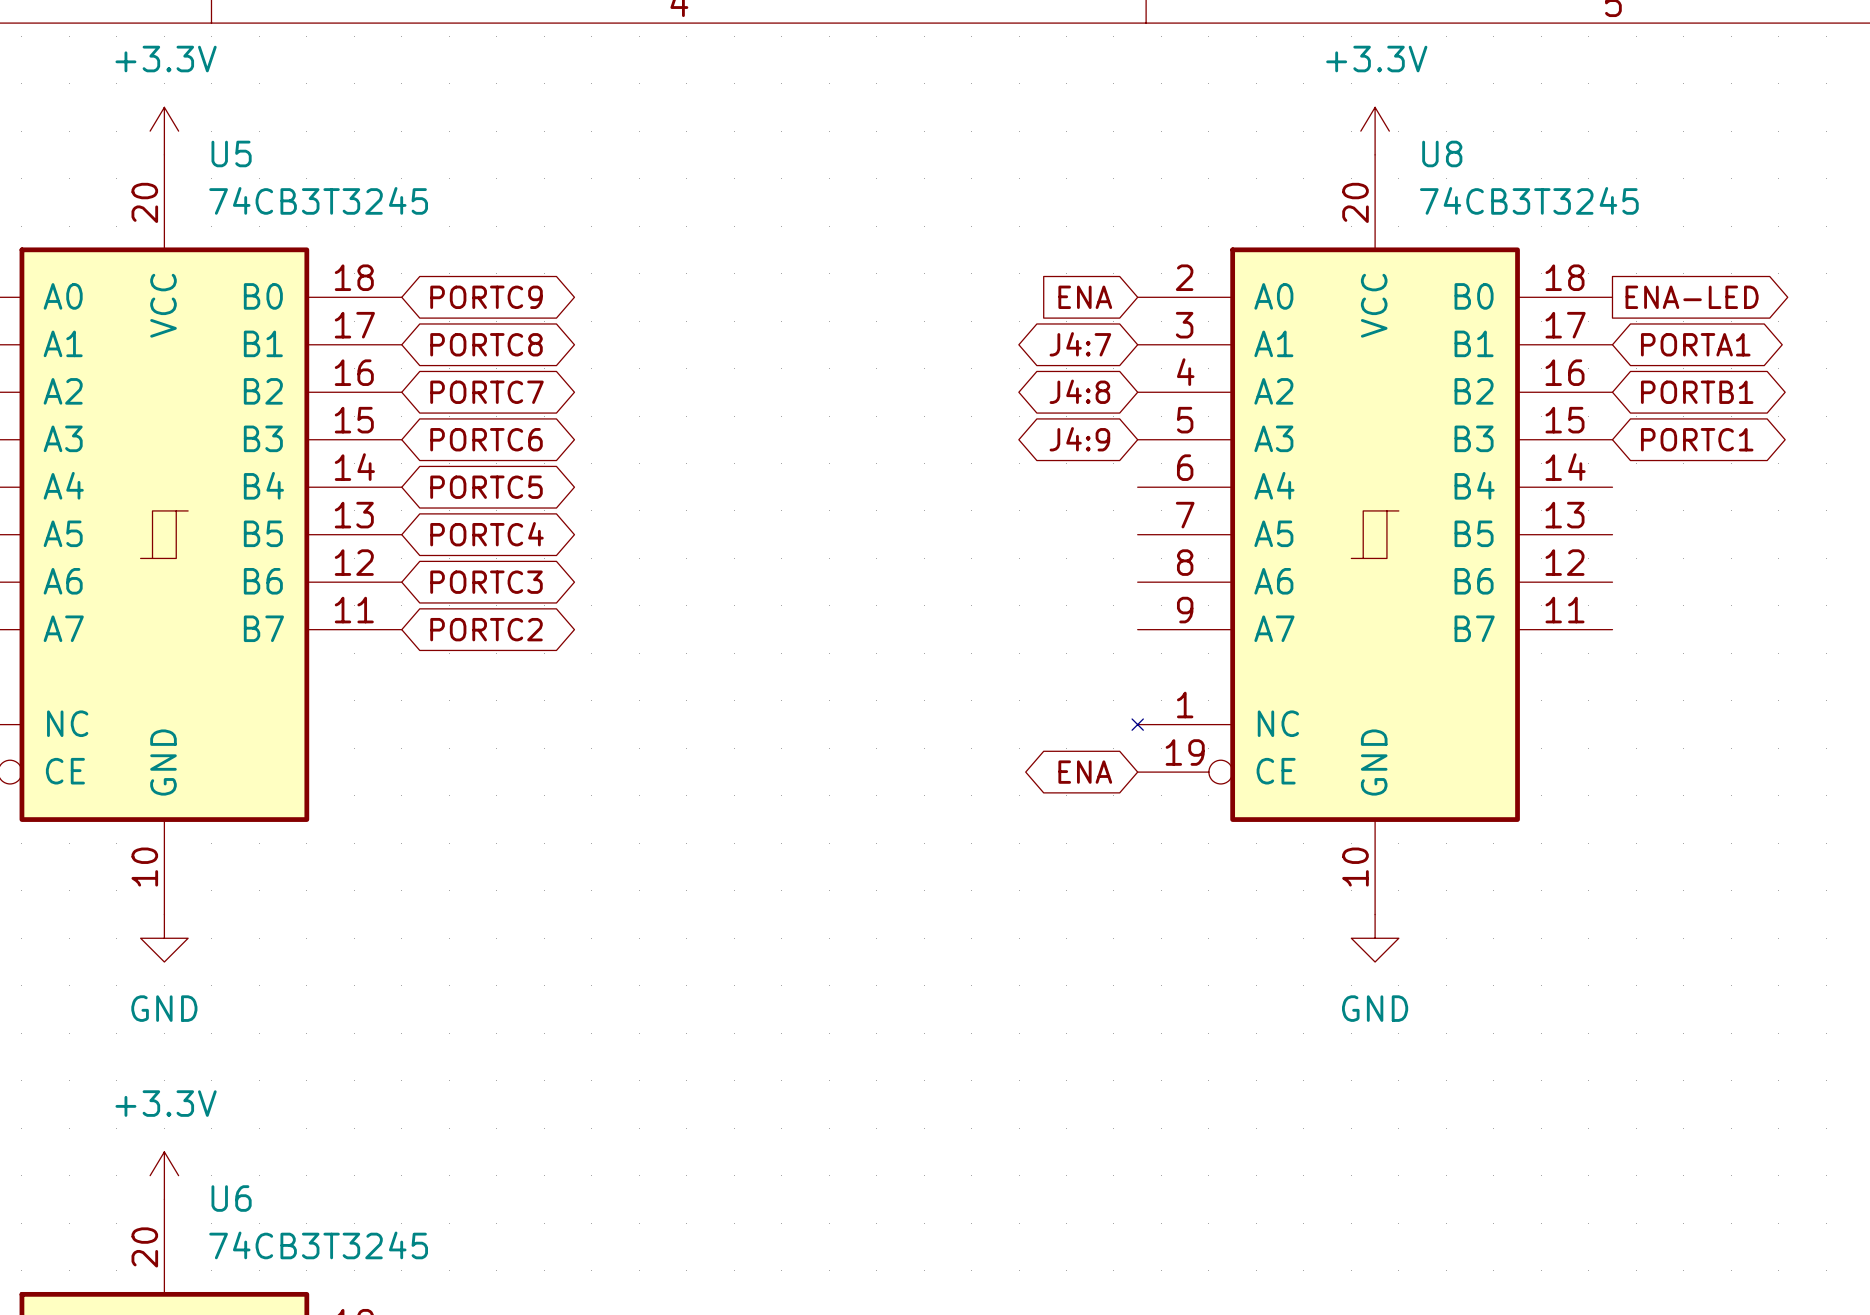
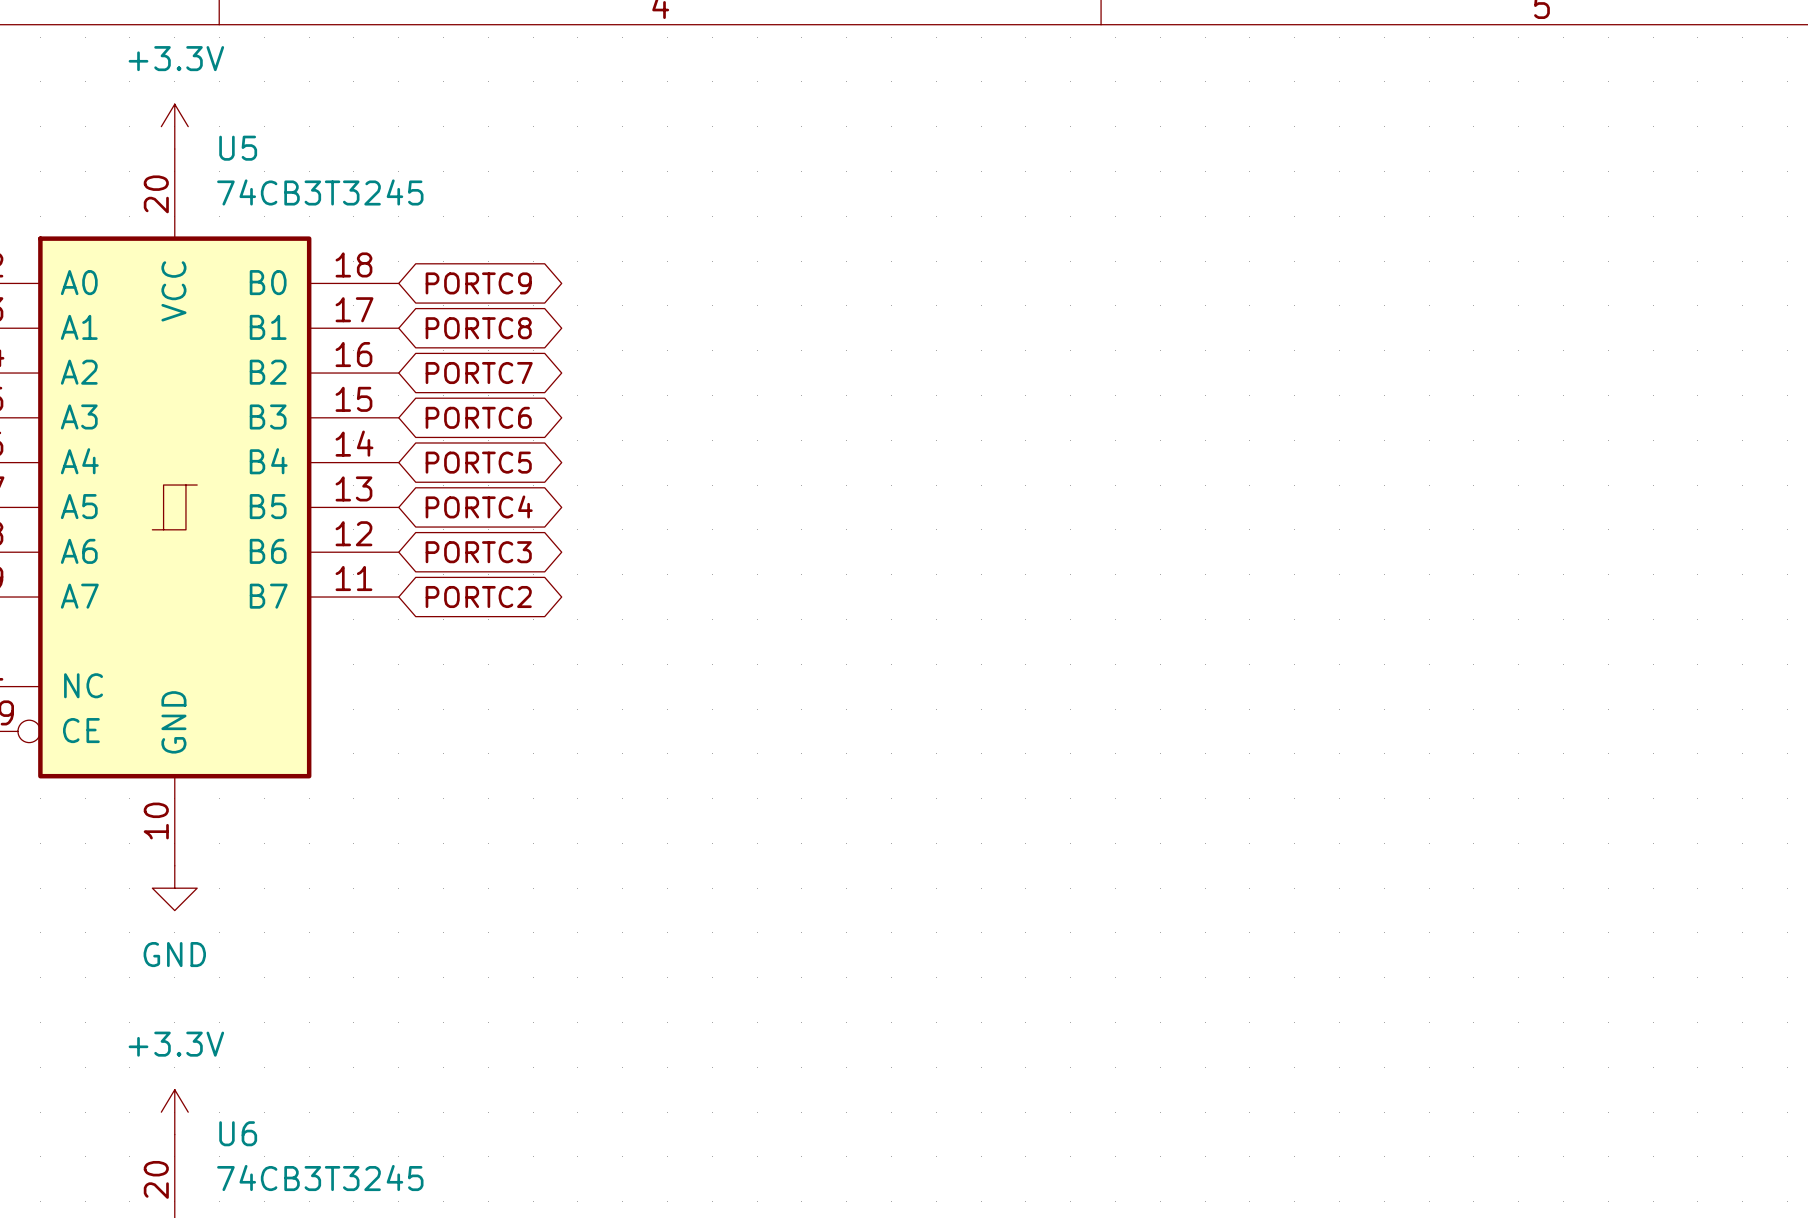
power symbol: +3.3V (1375, 131) -> none
global label: ENA (1085, 297) -> none
global label: ENA-LED (1692, 297) -> none
global label: J4:7 (1080, 344) -> none
global label: PORTA1 (1695, 344) -> none
global label: J4:8 (1079, 391) -> none
global label: PORTB1 (1697, 392) -> none
global label: J4:9 (1079, 439) -> none
global label: PORTC1 (1697, 439) -> none
U8: 74CB3T3245 (1372, 534) -> none
global label: ENA (1085, 772) -> none
power symbol: GND (1375, 938) -> none

